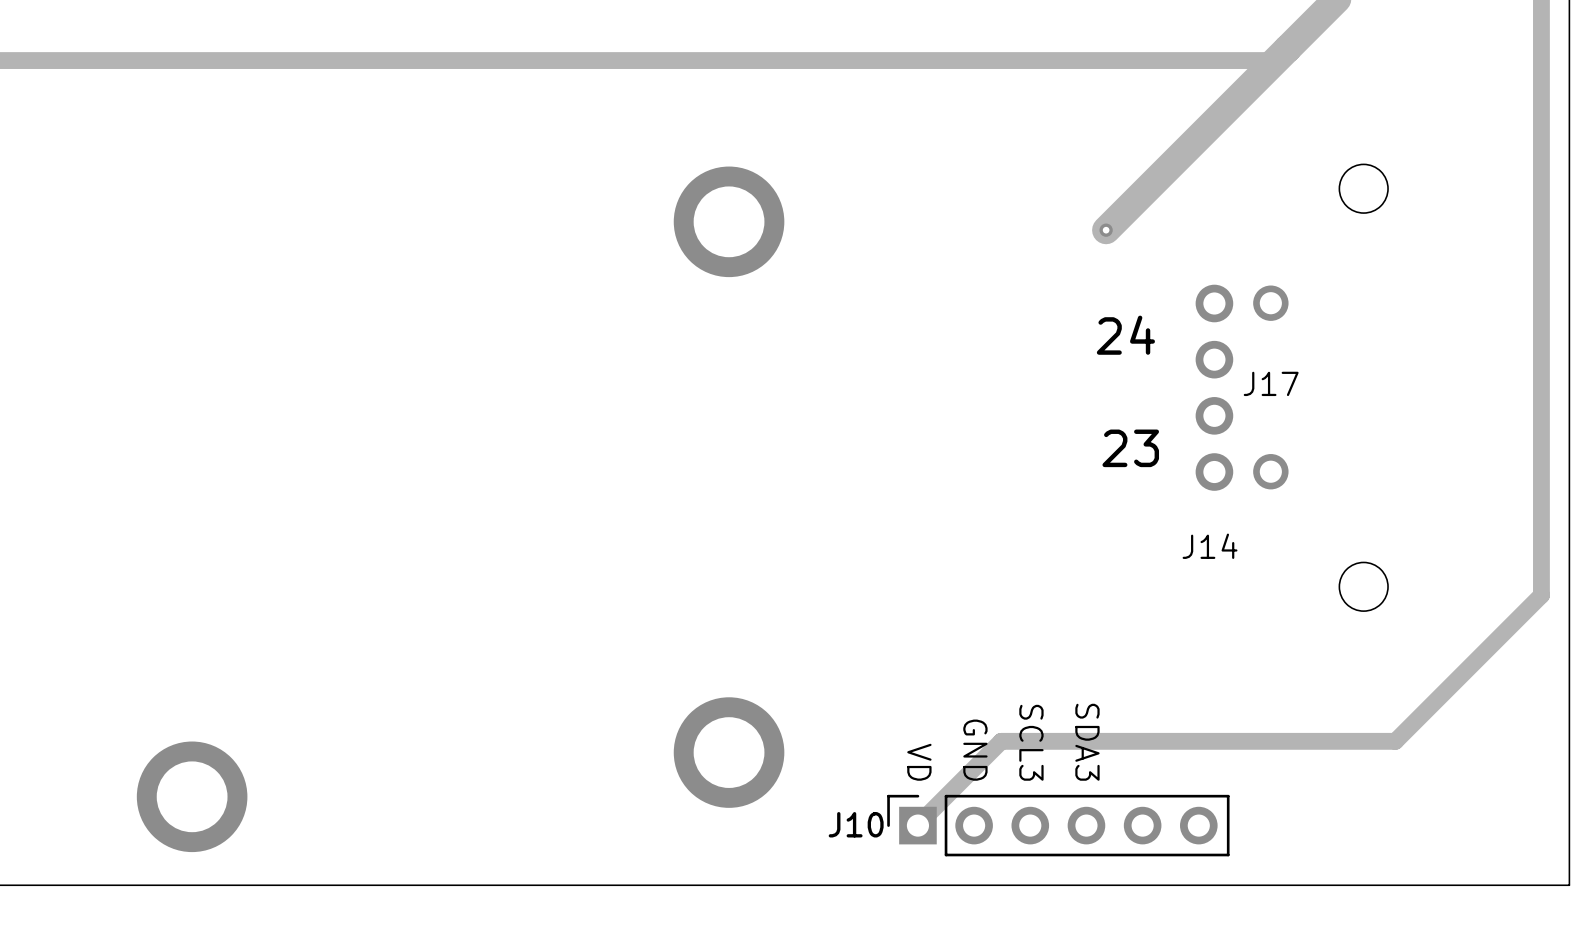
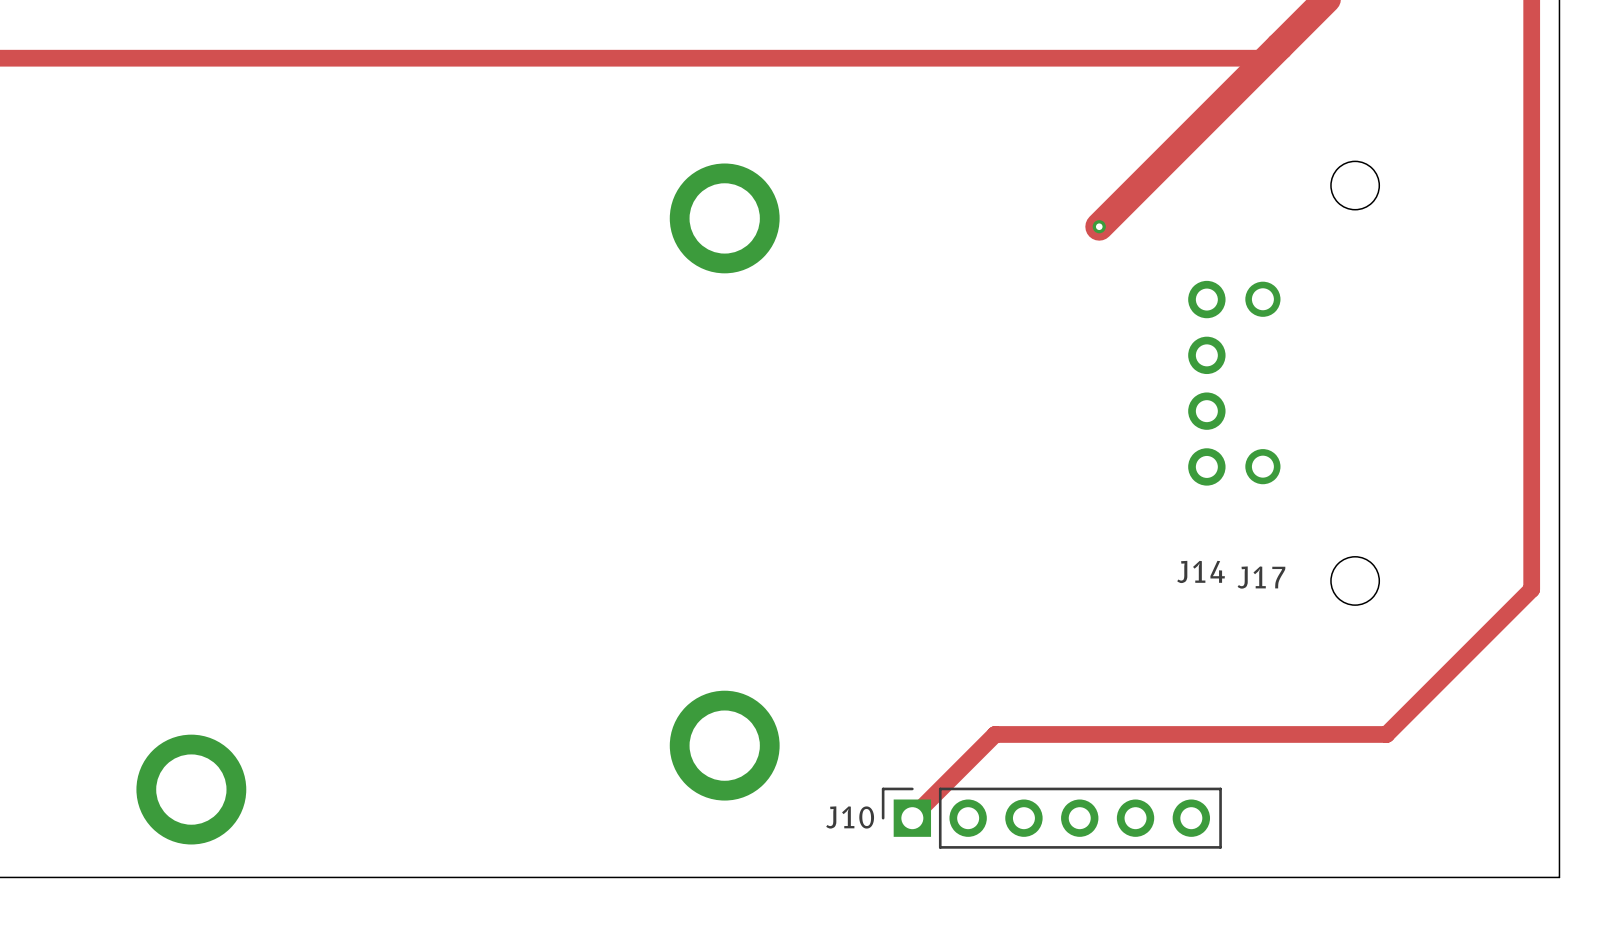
text: 24 (1125, 335) -> none
J17 name position: J17 (1271, 383) -> J17 (1261, 577)
text: 23 (1130, 448) -> none
J14 name position: J14 (1210, 546) -> J14 (1201, 571)
text: SCL3 (1031, 742) -> none
text: SDA3 (1087, 742) -> none
text: GND (975, 750) -> none
text: VD (919, 762) -> none

